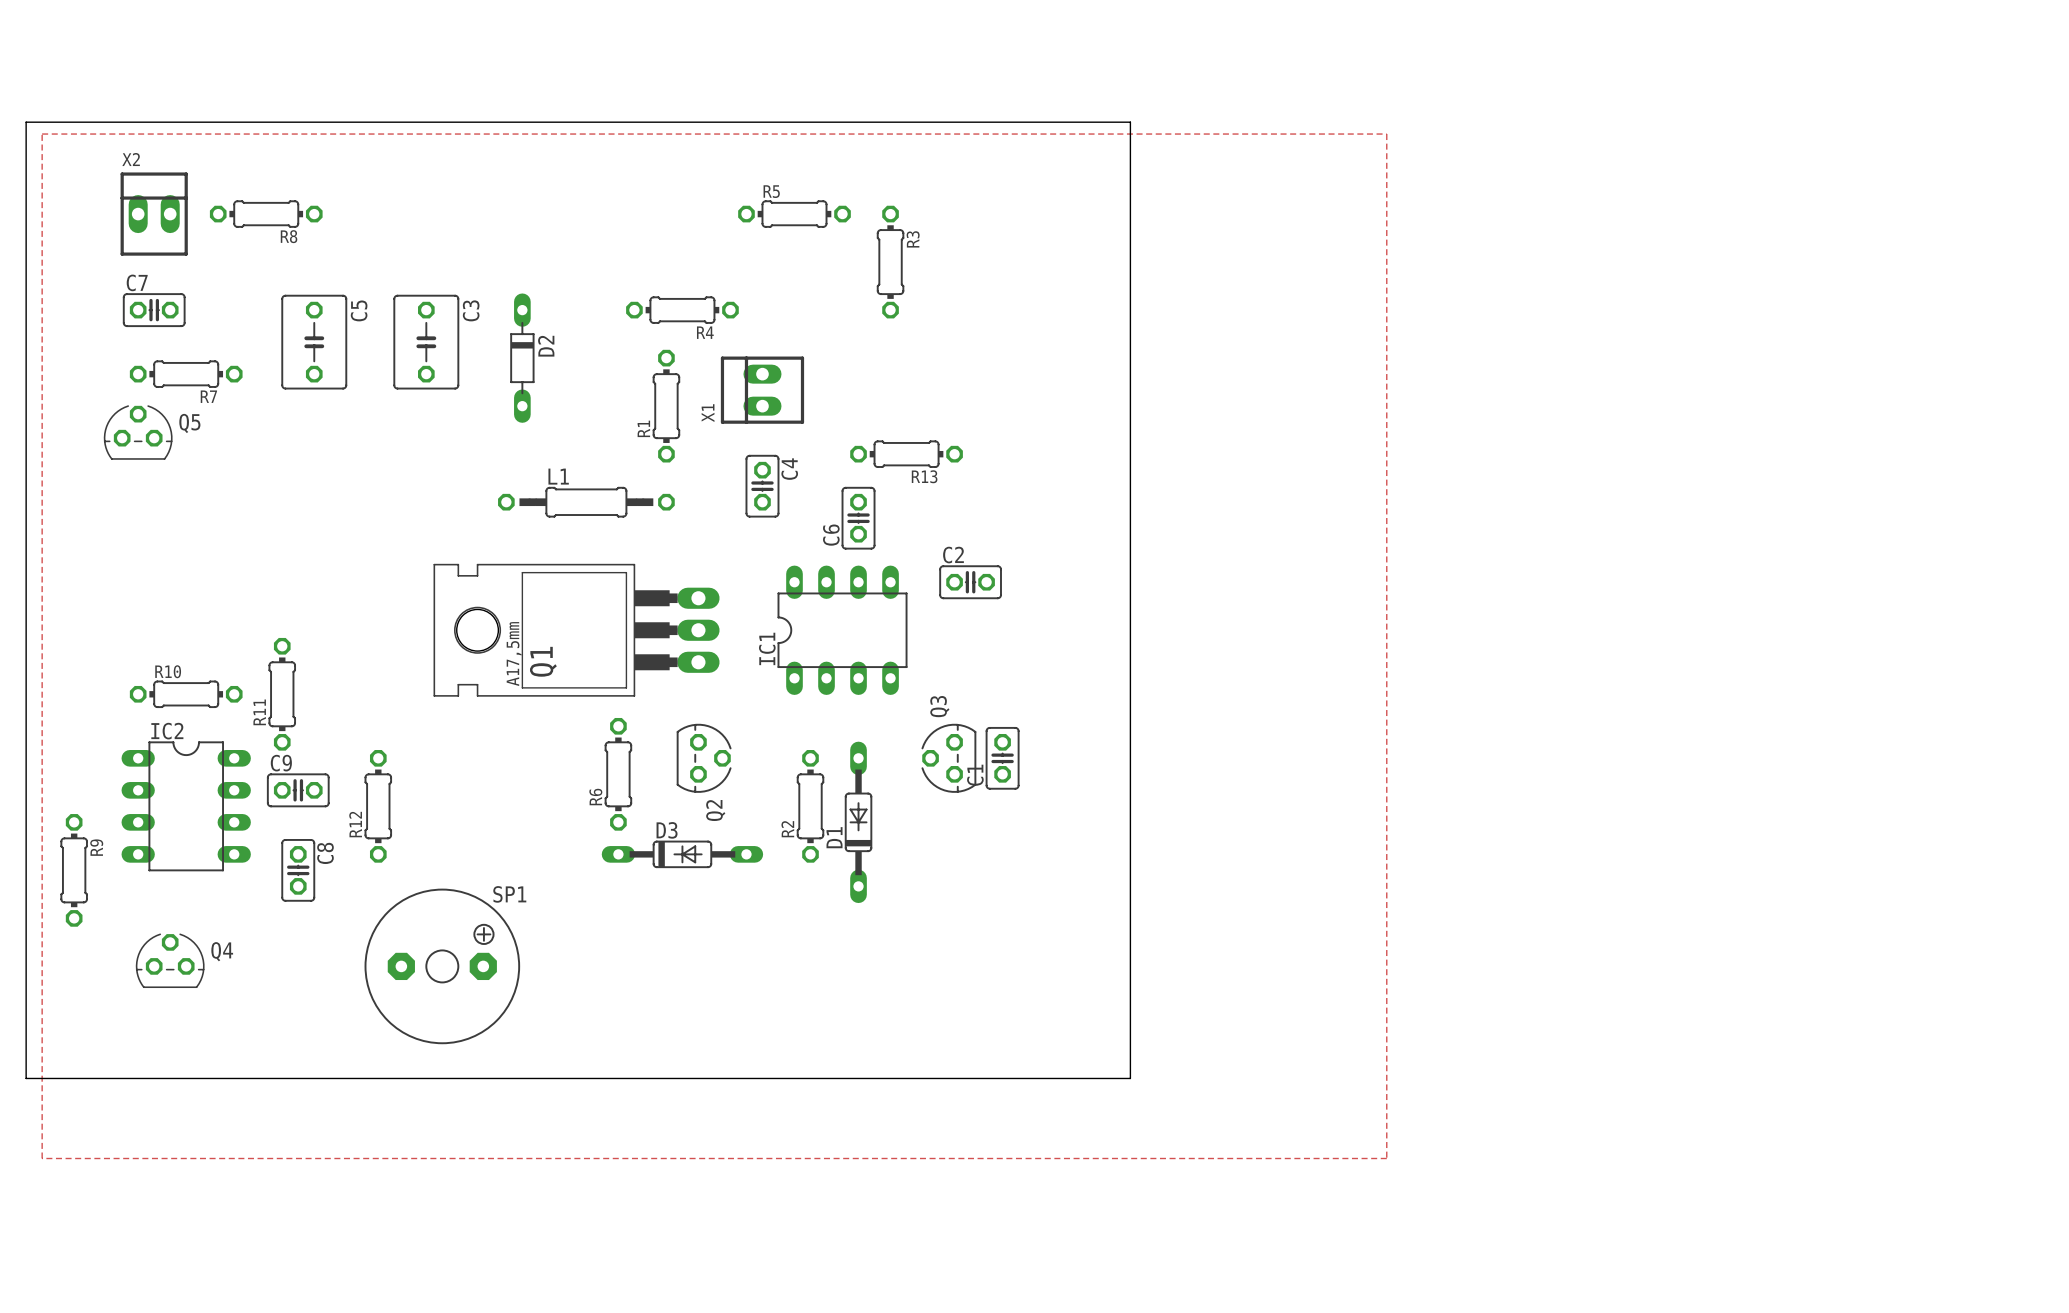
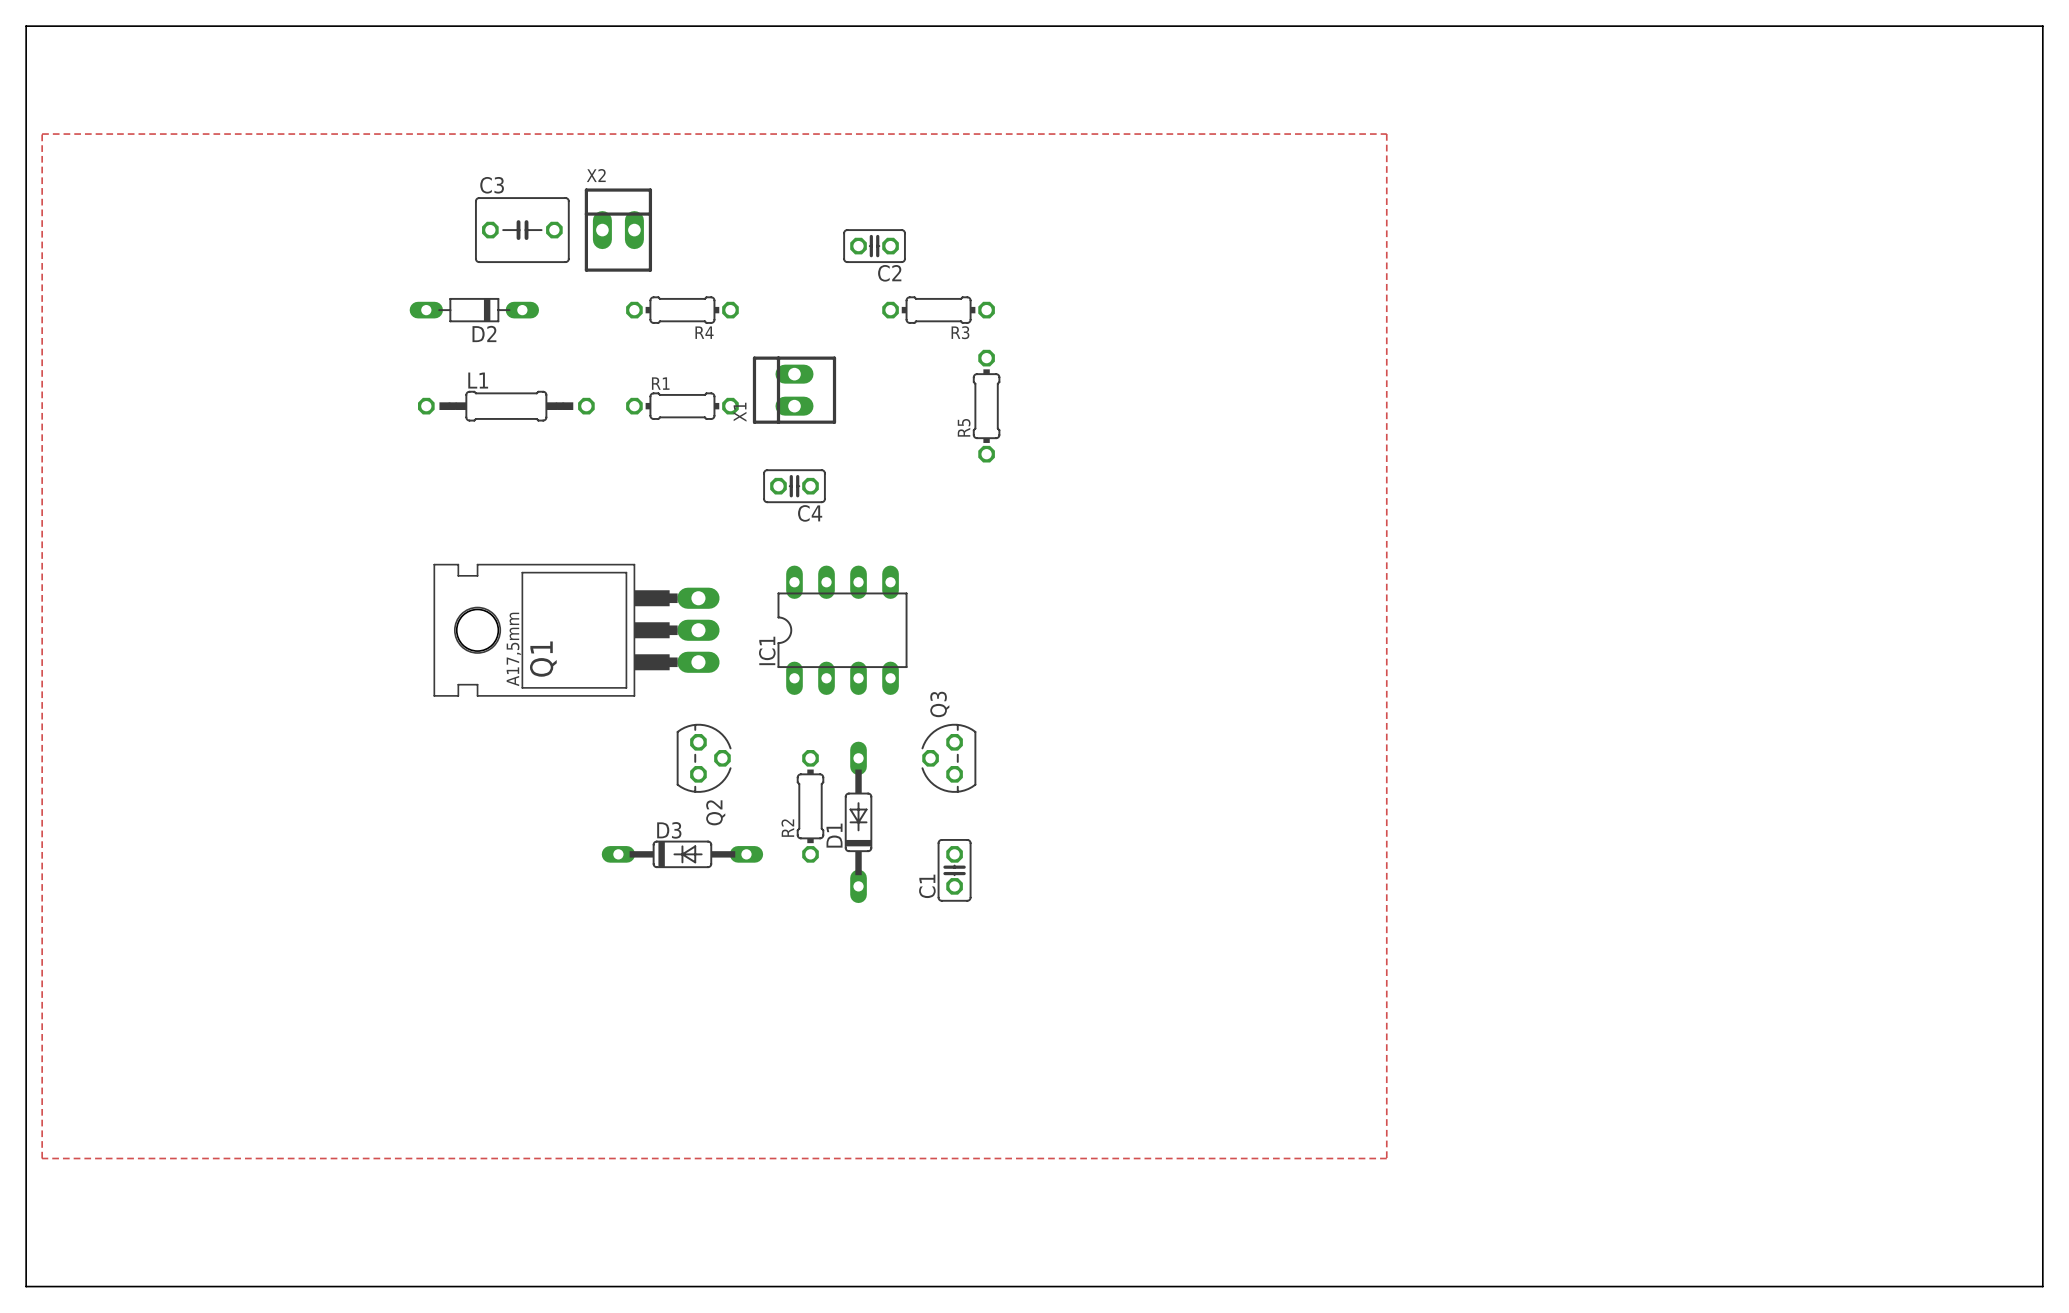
board edge: (26, 122) (1130, 122) (1130, 1078) (26, 1078) -> (26, 122) (26, 26) (2042, 26) (2042, 1286) (26, 1286) (26, 1078)
R5 name position: R5 (771, 191) -> R5 (964, 427)
X2 position: (154, 214) -> (618, 230)
R8: (266, 214) -> none
R5 rotation: 0° (794, 214) -> 90° clockwise (986, 406)
R5 position: (794, 214) -> (986, 406)
R3 rotation: 0° (890, 262) -> 90° clockwise (938, 310)
R3 position: (890, 262) -> (938, 310)
C7: (154, 310) -> none
C5: (314, 342) -> none
C3 rotation: 0° (426, 342) -> 90° counterclockwise (522, 230)
C3 position: (426, 342) -> (522, 230)
D2 rotation: 0° (522, 358) -> 90° clockwise (474, 310)
R7: (186, 374) -> none
X1 position: (762, 390) -> (794, 390)
R1 rotation: 0° (666, 406) -> 90° clockwise (682, 406)
Q5: (138, 432) -> none
R13: (906, 454) -> none
C4 rotation: 0° (762, 486) -> 90° clockwise (794, 486)
L1 position: (586, 502) -> (506, 406)
C6: (858, 518) -> none
C2 name position: C2 (953, 555) -> C2 (889, 273)
C2 position: (970, 582) -> (874, 246)
R10: (186, 694) -> none
R11: (282, 694) -> none
C1 position: (1002, 758) -> (954, 870)
R6: (618, 774) -> none
C9: (298, 790) -> none
IC2: (186, 806) -> none
R12: (378, 806) -> none
R9: (74, 870) -> none
C8: (298, 870) -> none
Q4: (170, 960) -> none
SP1: (442, 966) -> none

